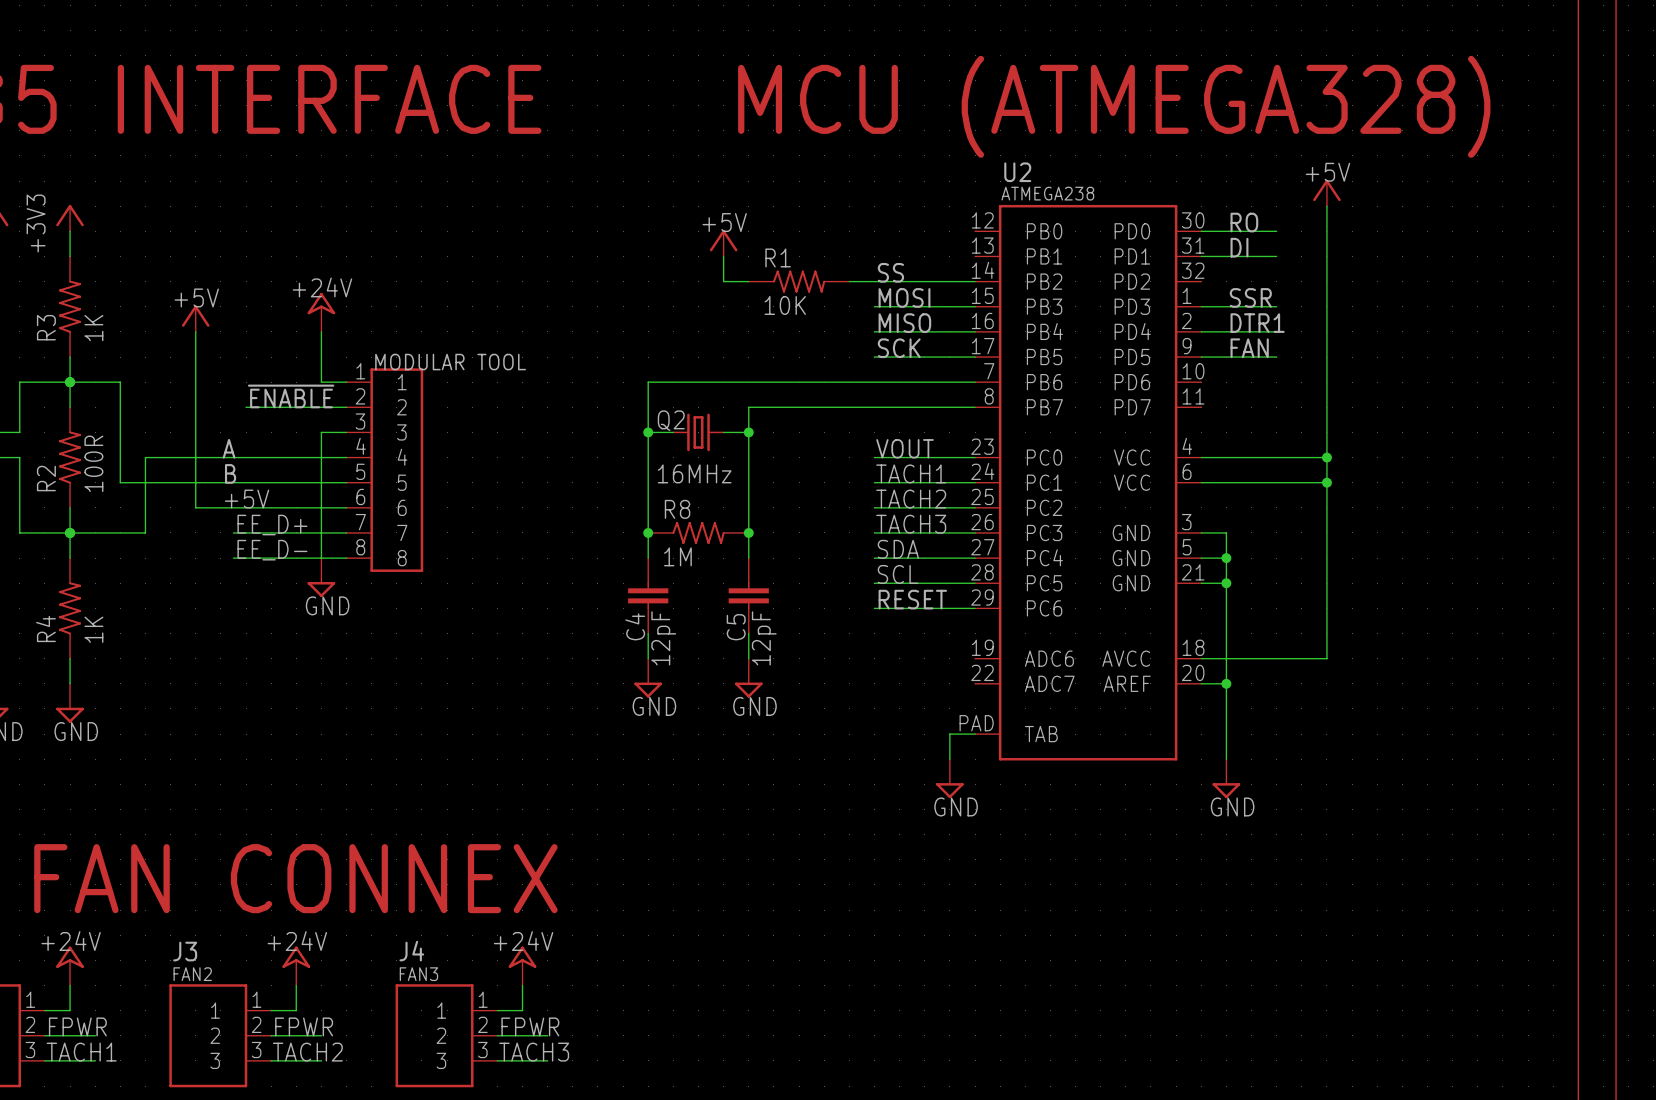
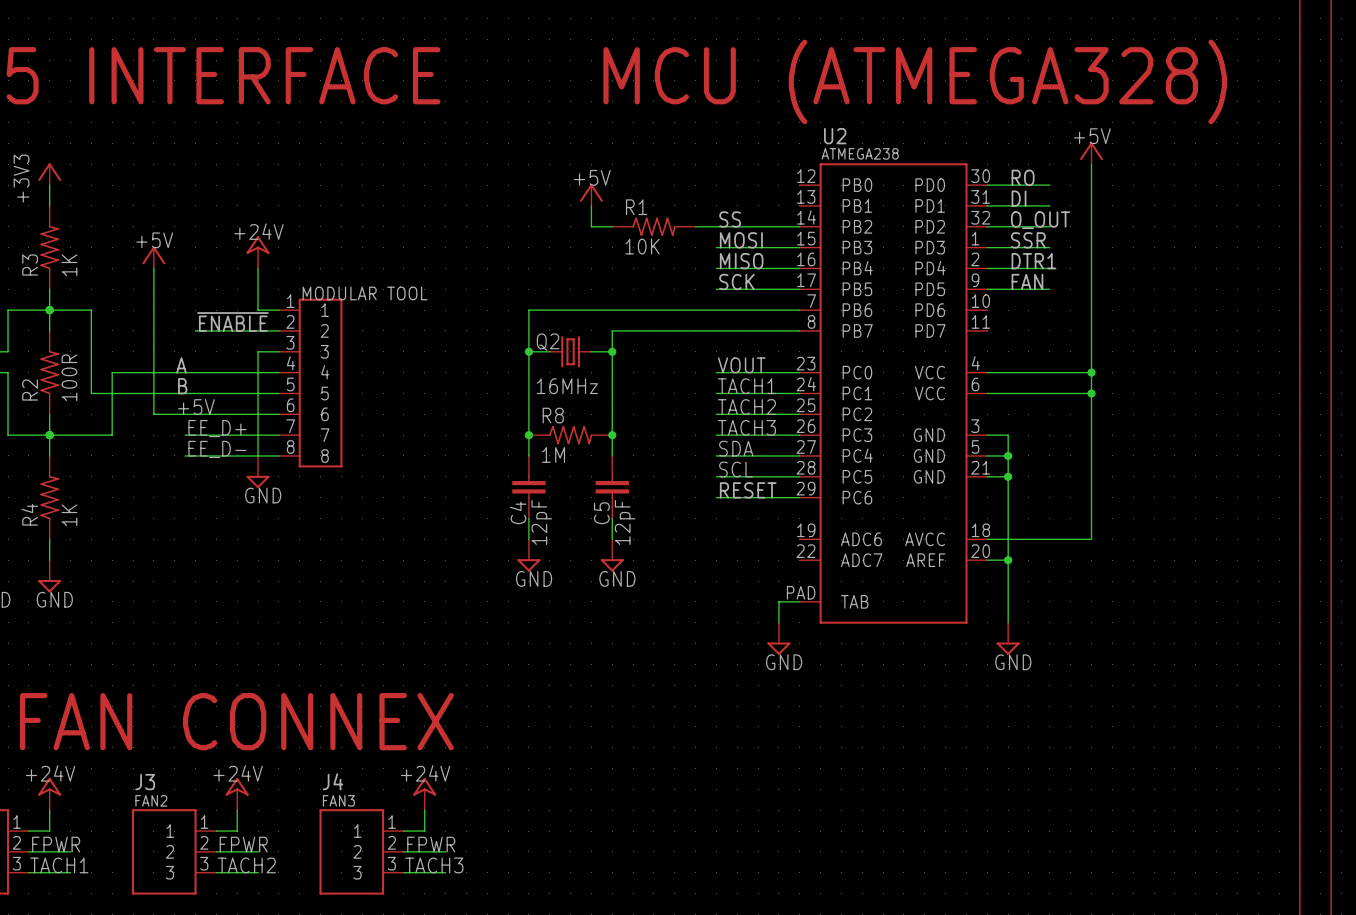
label: none -> O_OUT (1040, 220)
wire: none -> (987, 226) (1049, 226)

